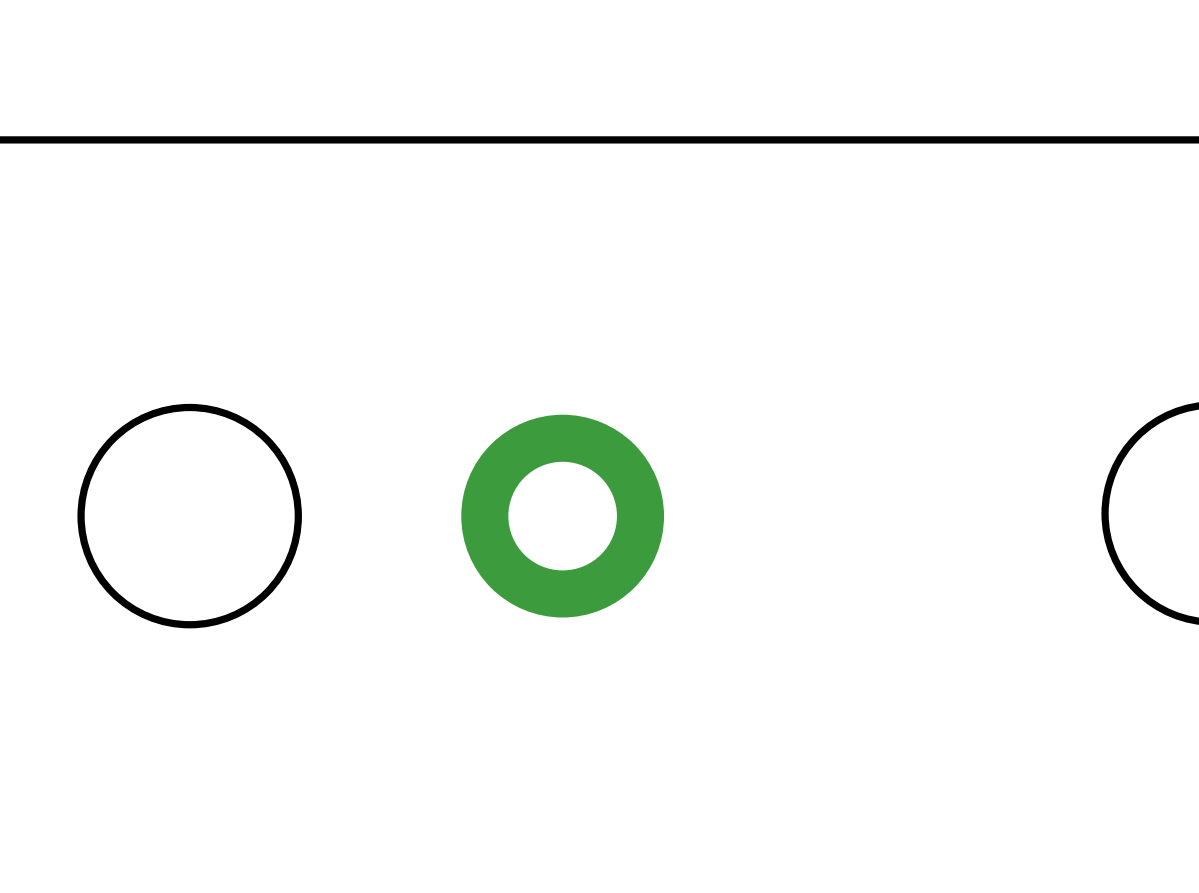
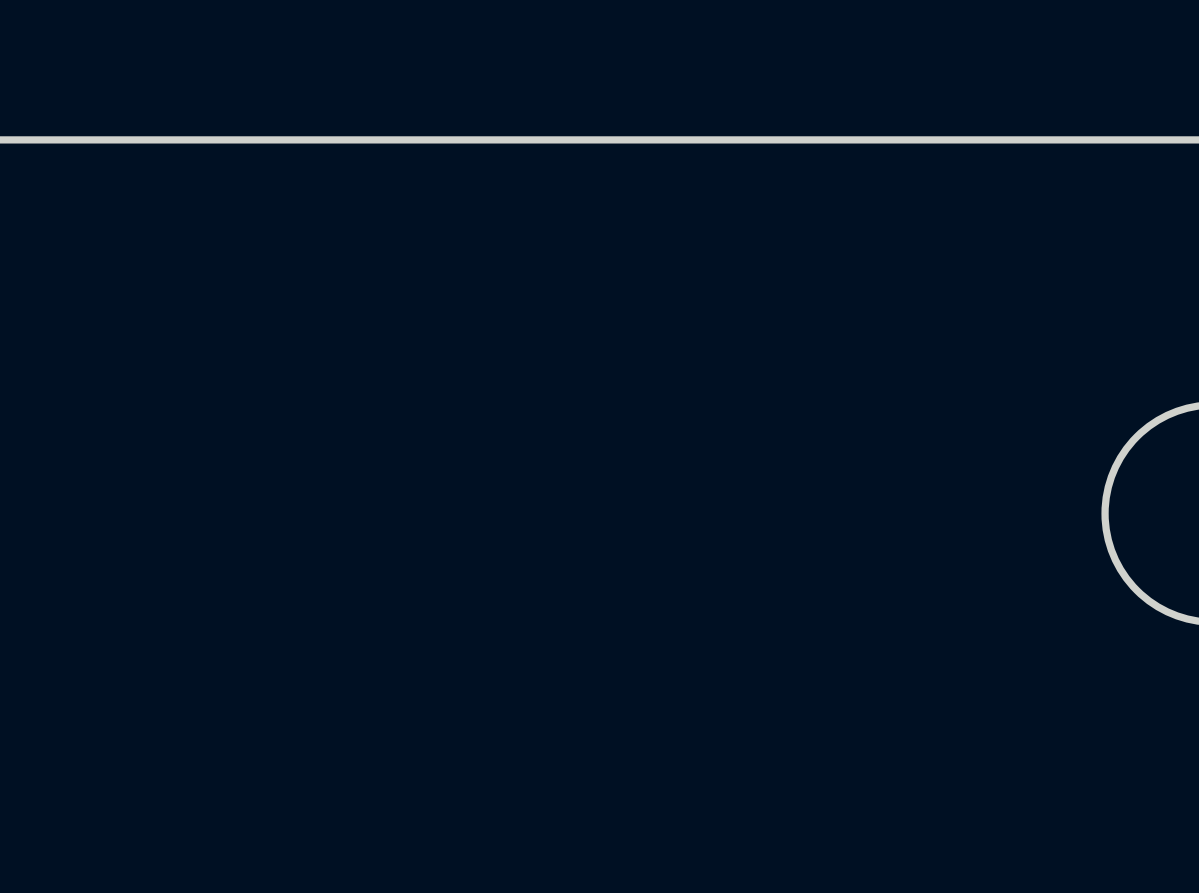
round board edge: [77, 403, 302, 629] -> none
part: (562, 516) -> none

